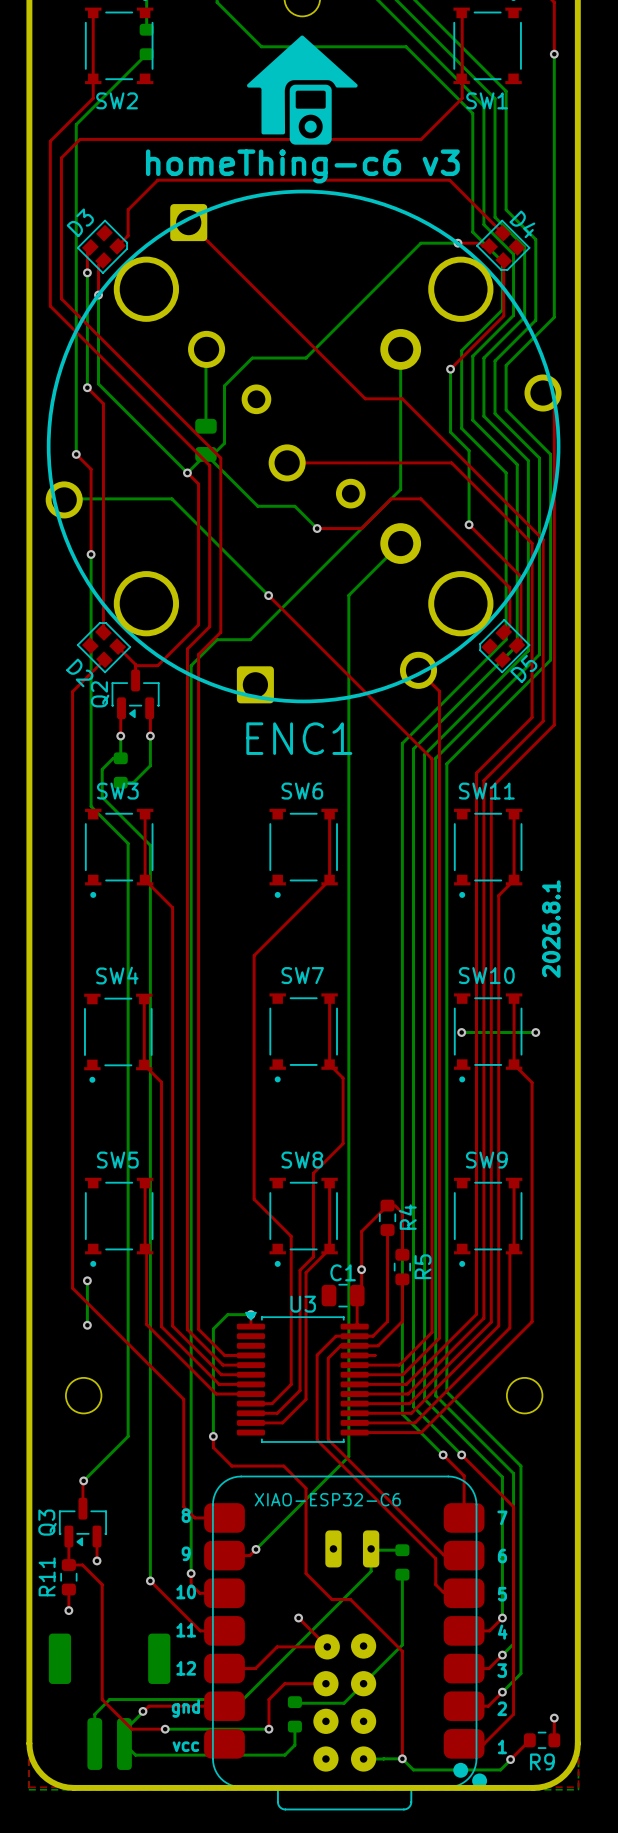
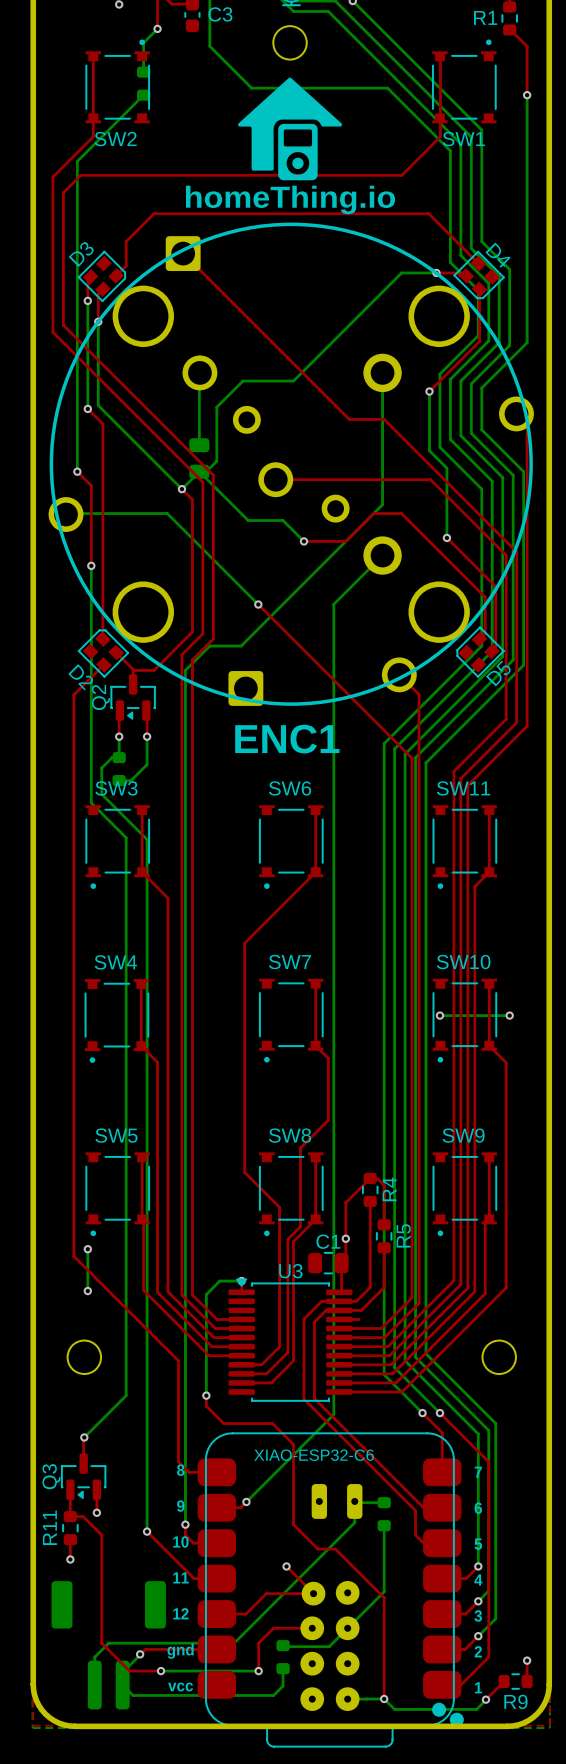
text: homeThing-c6 v3 (302, 166) -> homeThing.io (290, 199)
text: 2026.8.1 (551, 929) -> none

